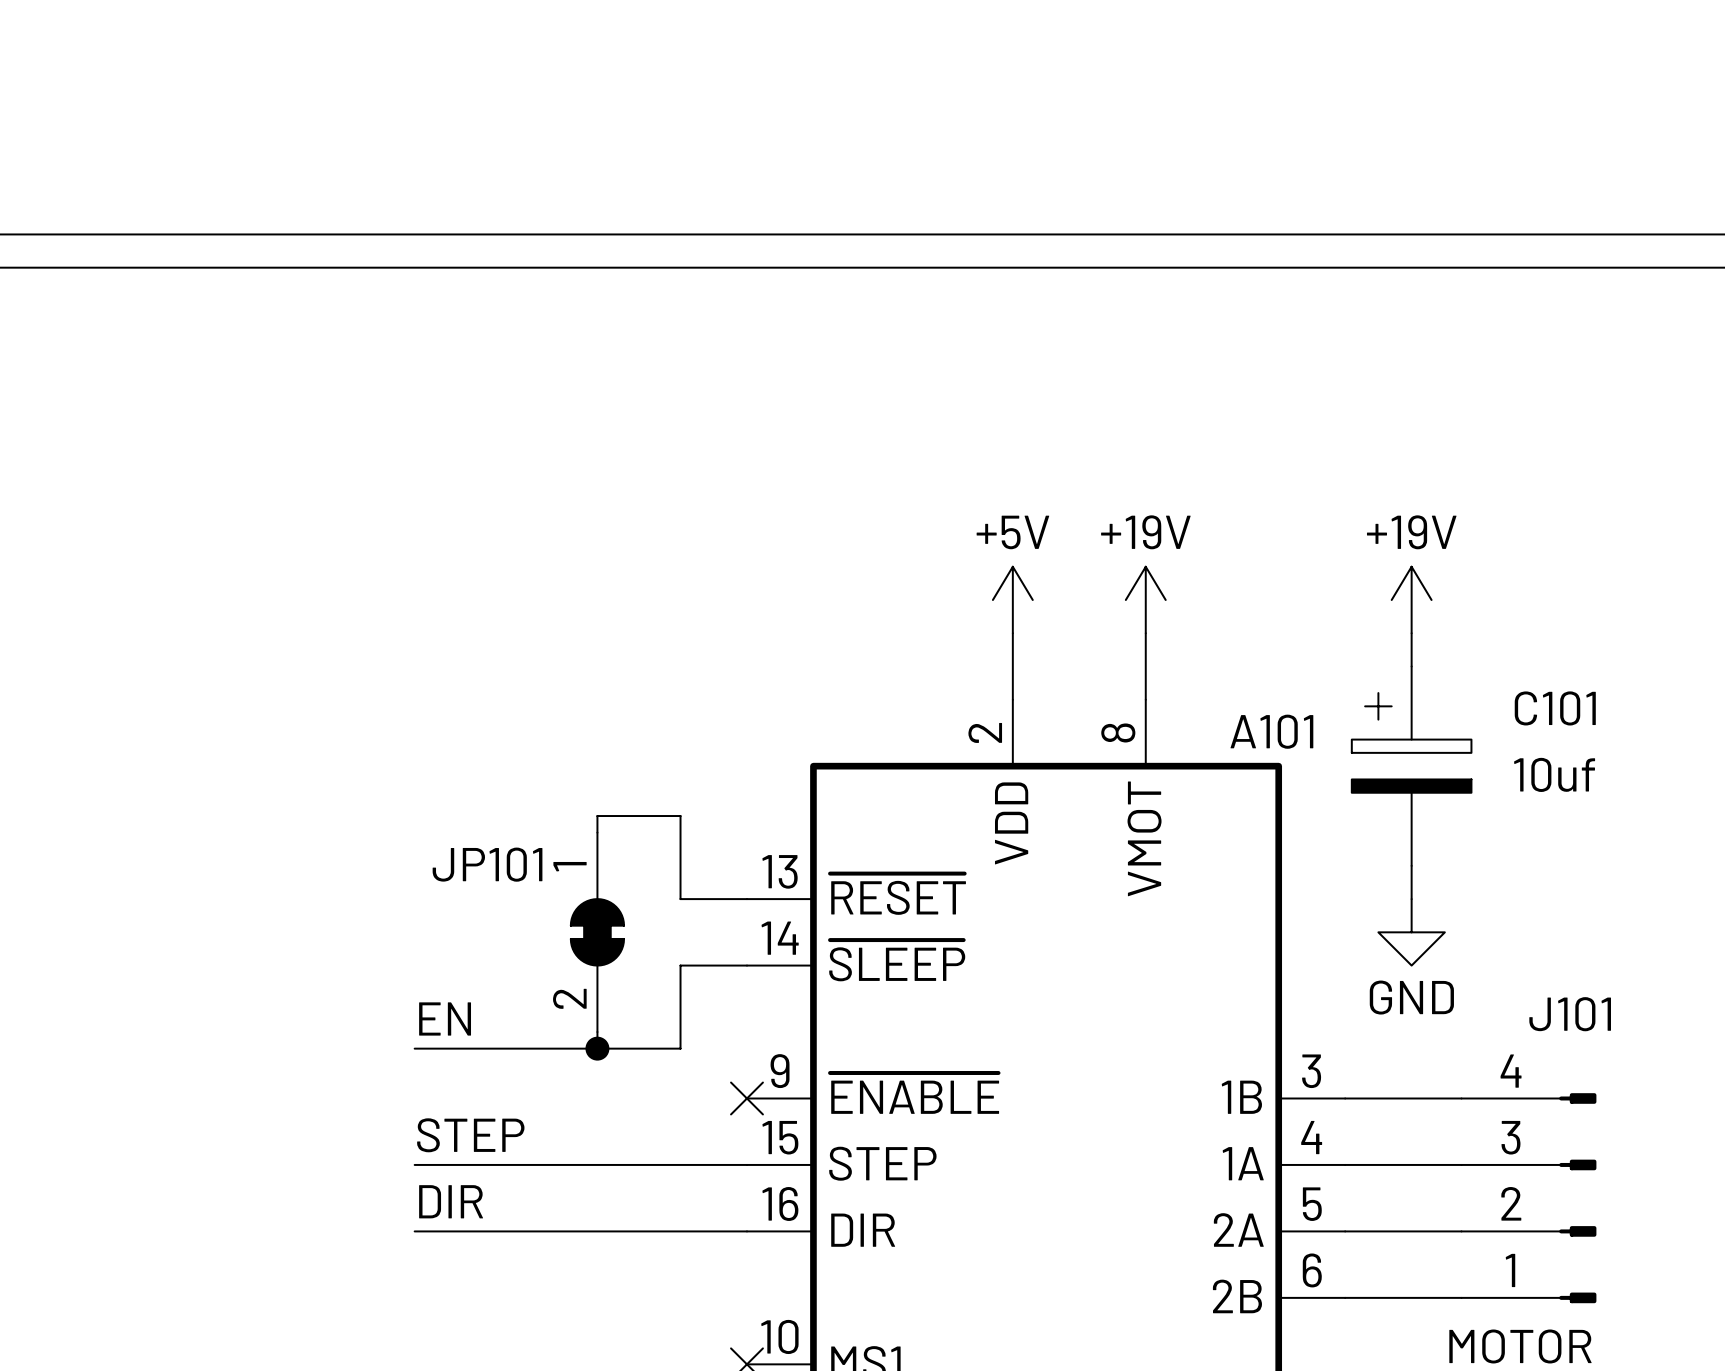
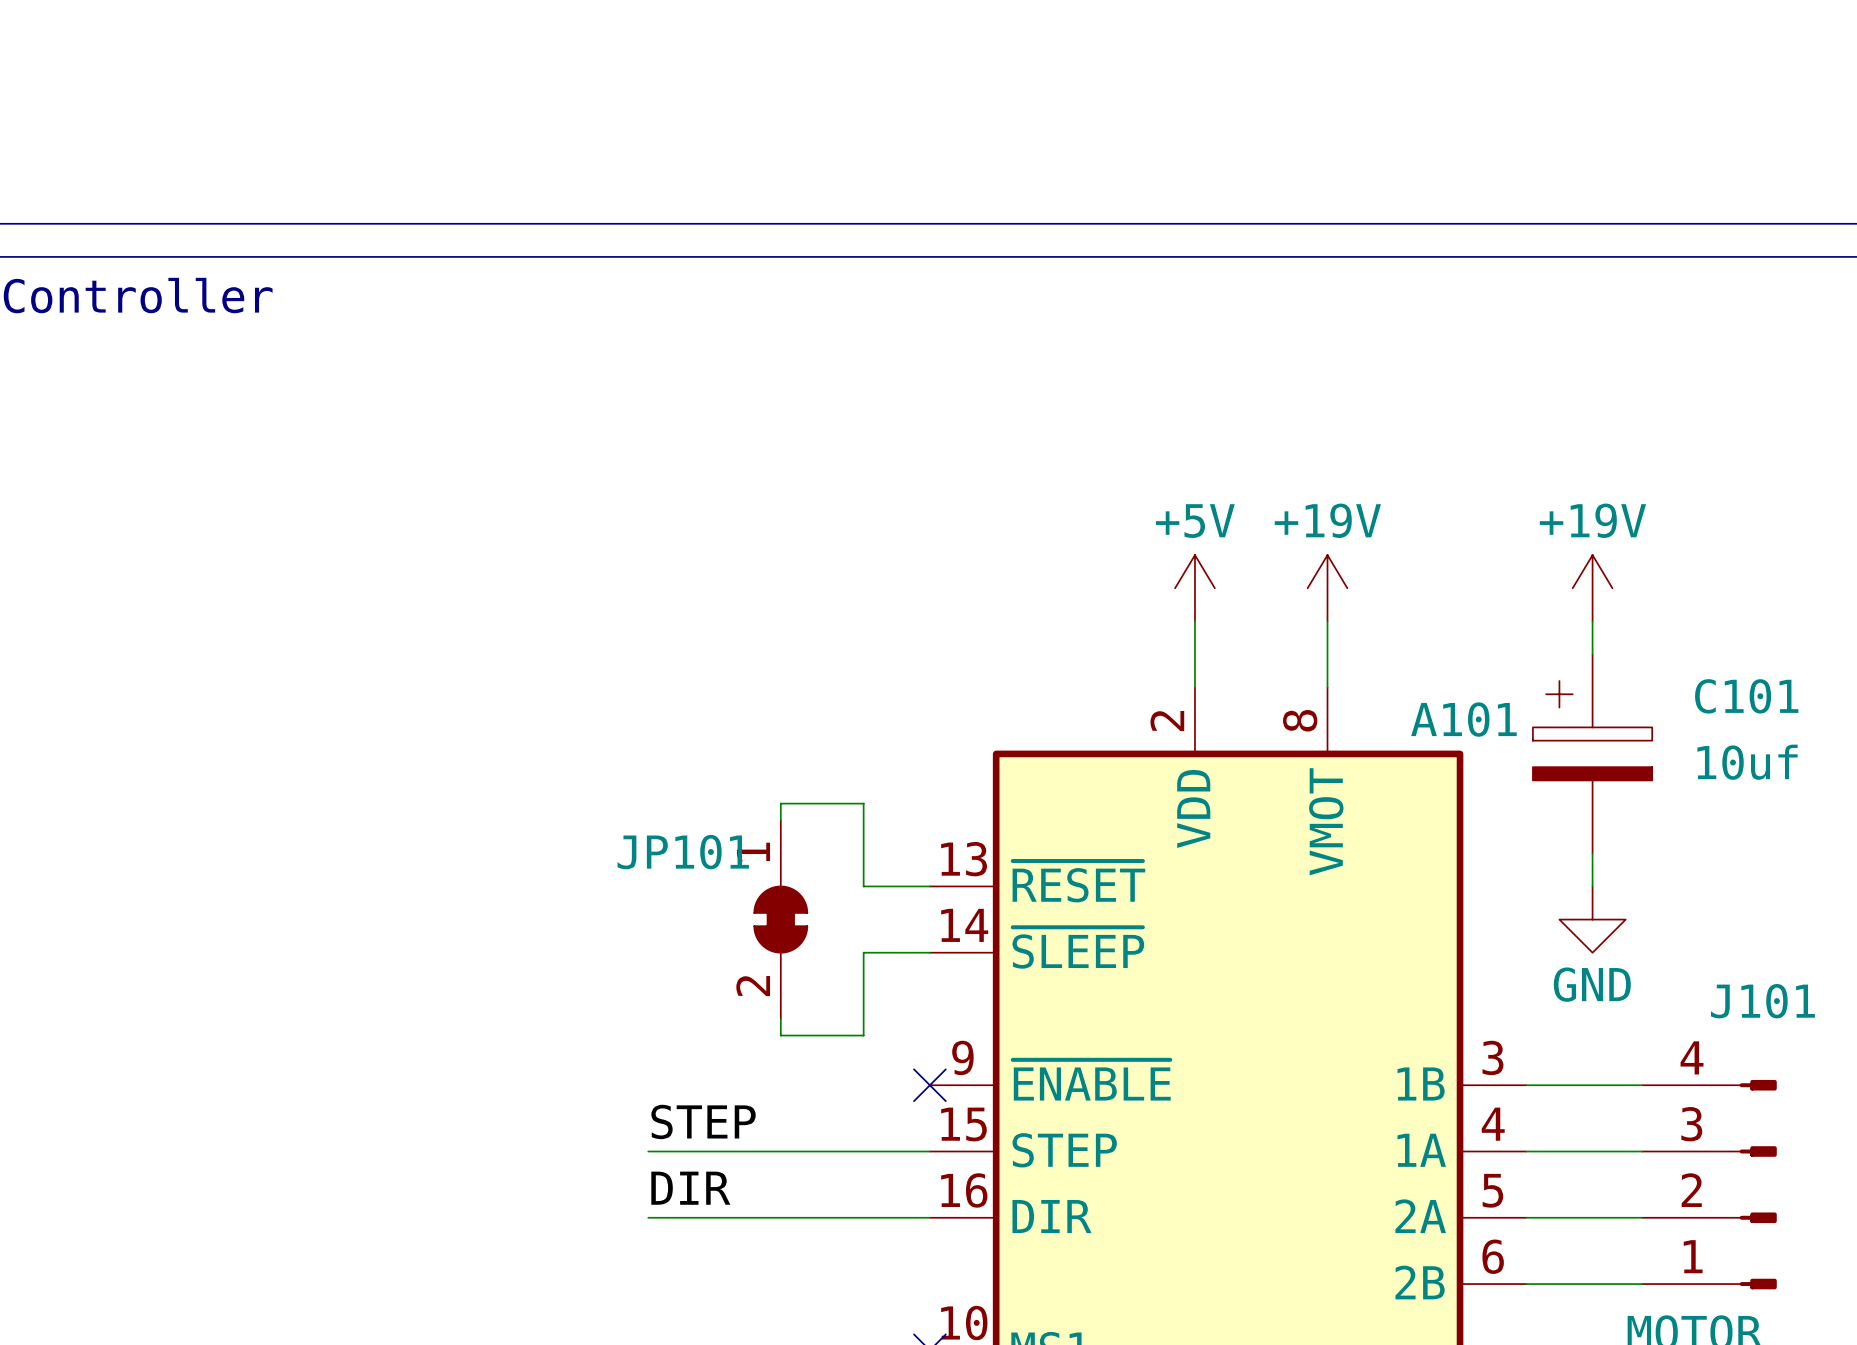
label: EN (445, 1018) -> none
wire: (414, 1048) (597, 1048) -> none
junction: (597, 1048) -> none
label position: STEP (470, 1135) -> STEP (703, 1121)
wire: (414, 1164) (464, 1164) -> none
label position: DIR (451, 1201) -> DIR (690, 1188)
wire: (414, 1231) (464, 1231) -> none

